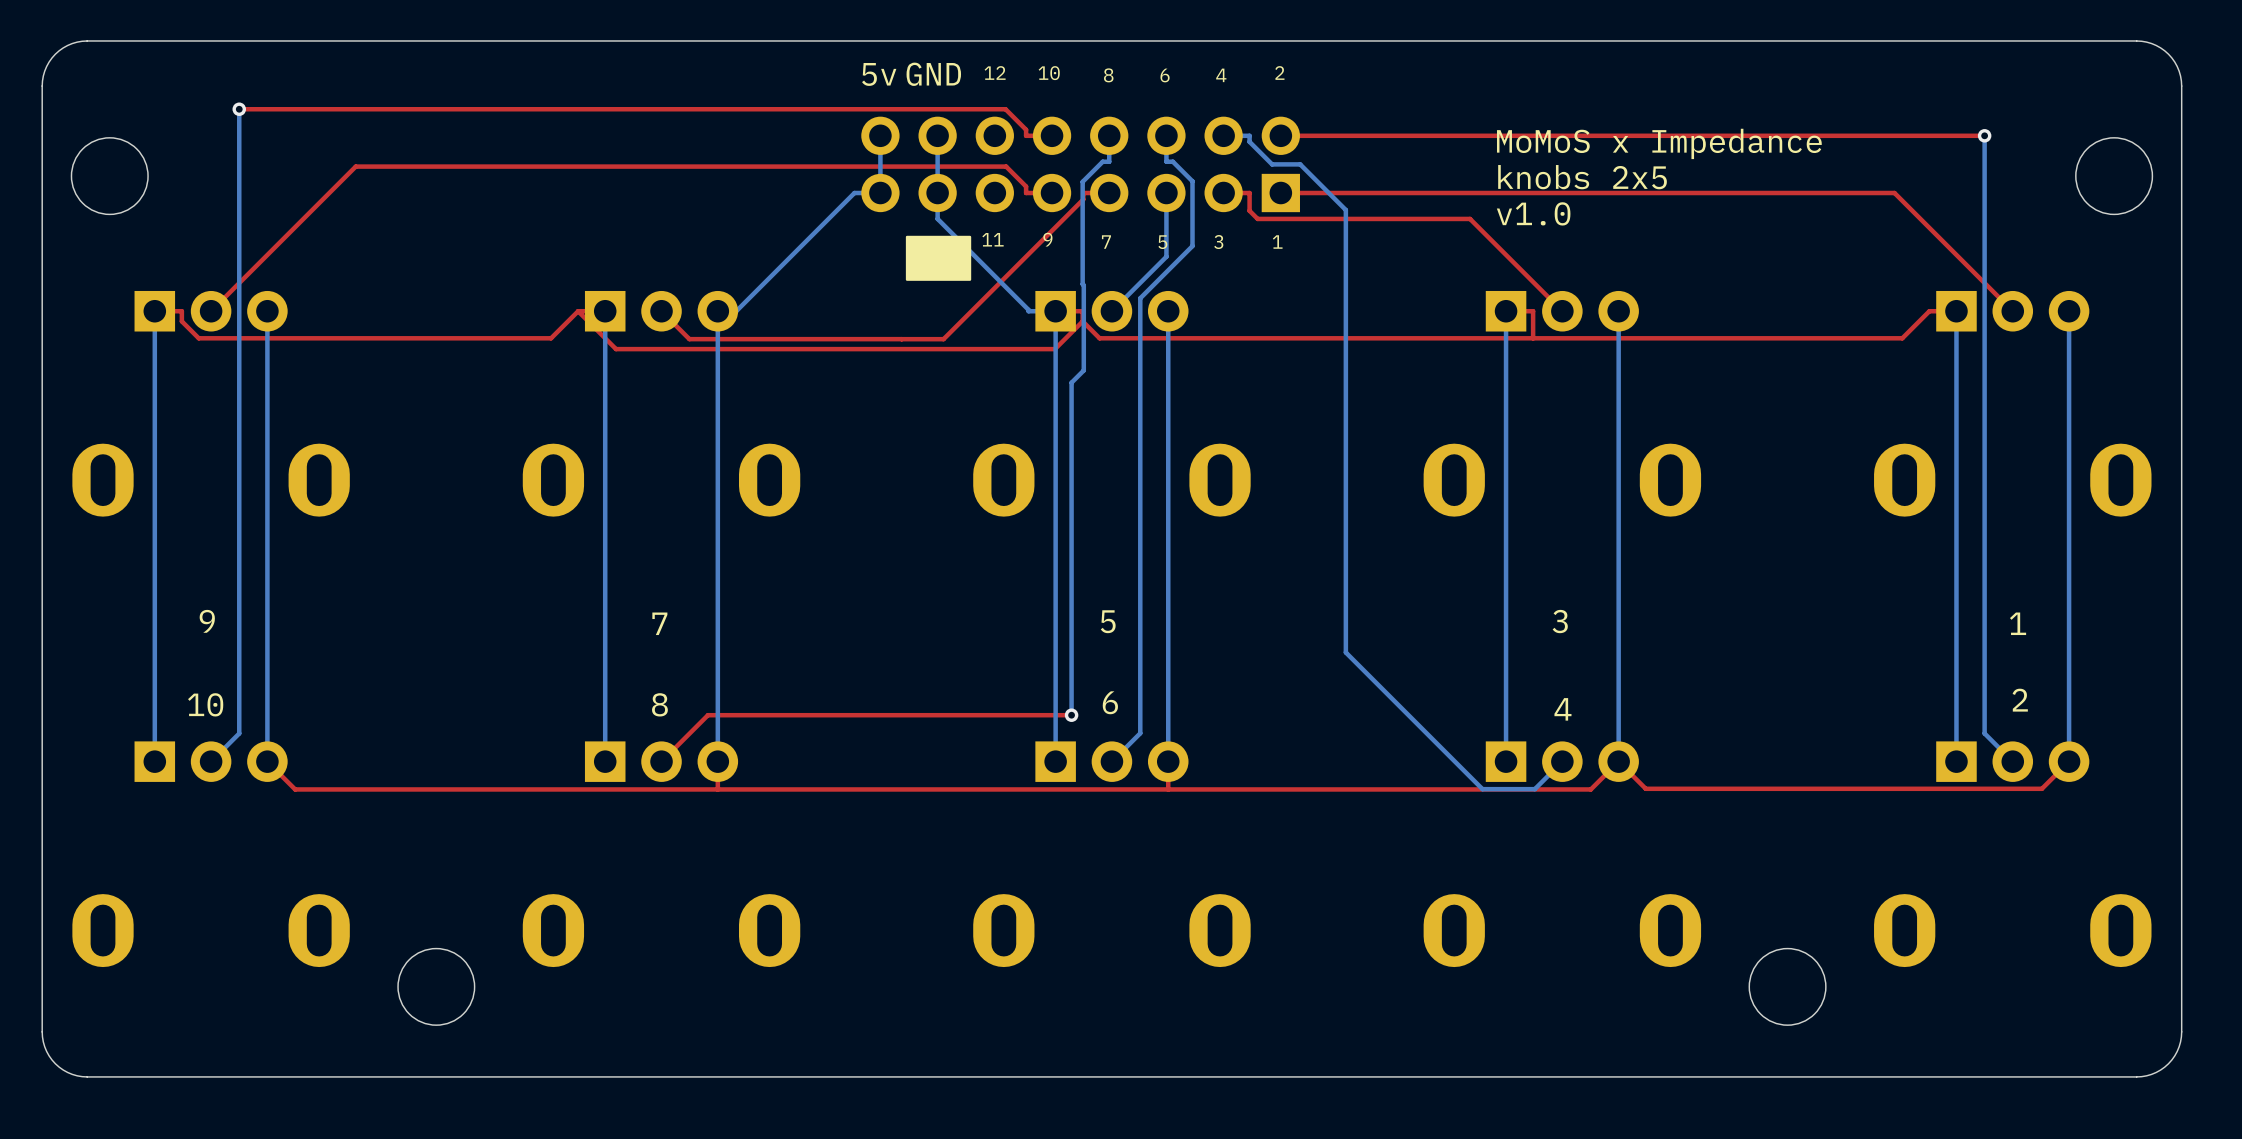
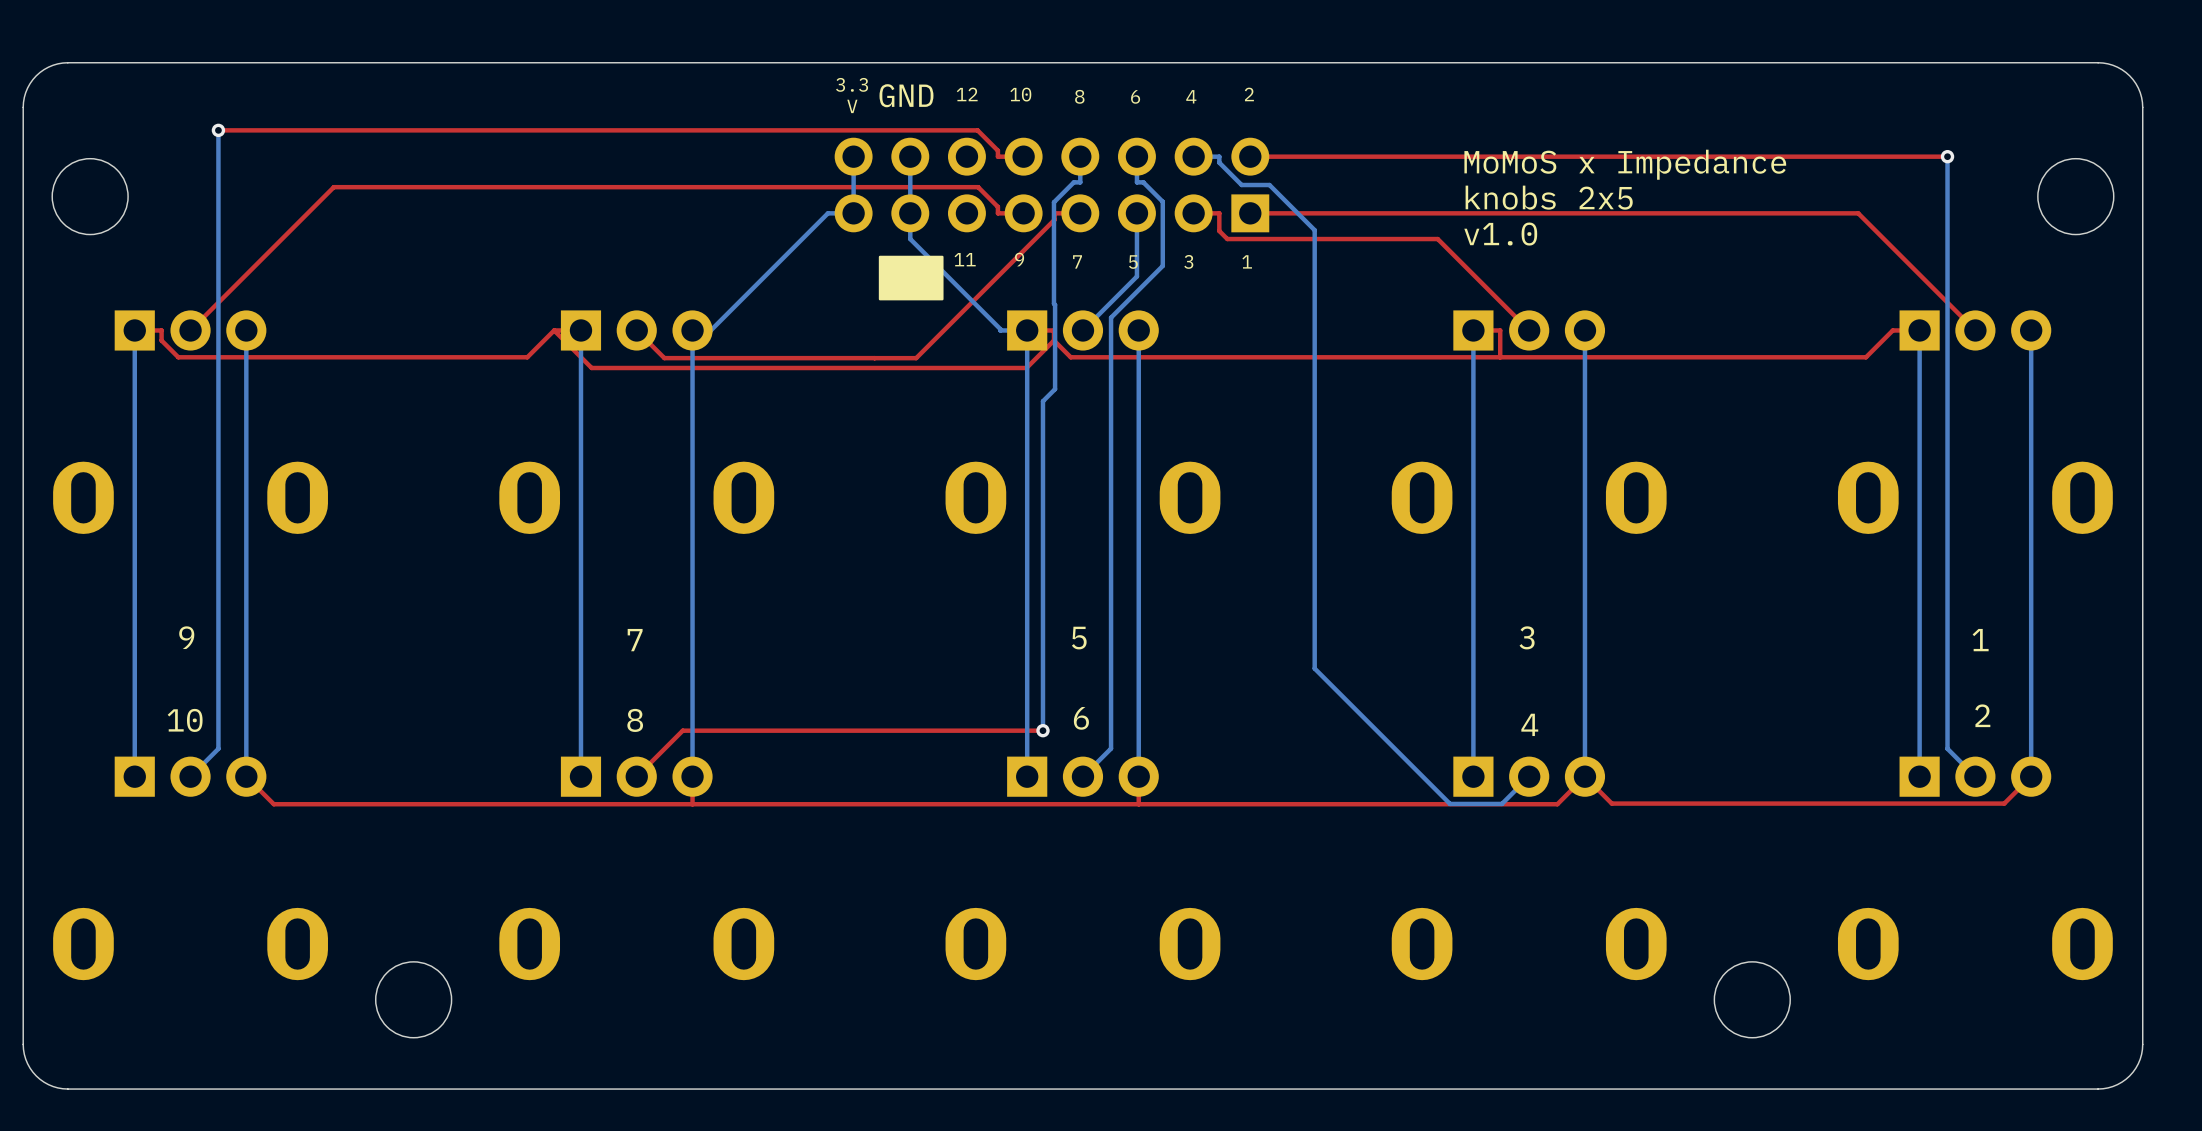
text: none -> 3.3 (852, 84)
text: 5v (879, 74) -> none
text: none -> V (852, 106)

